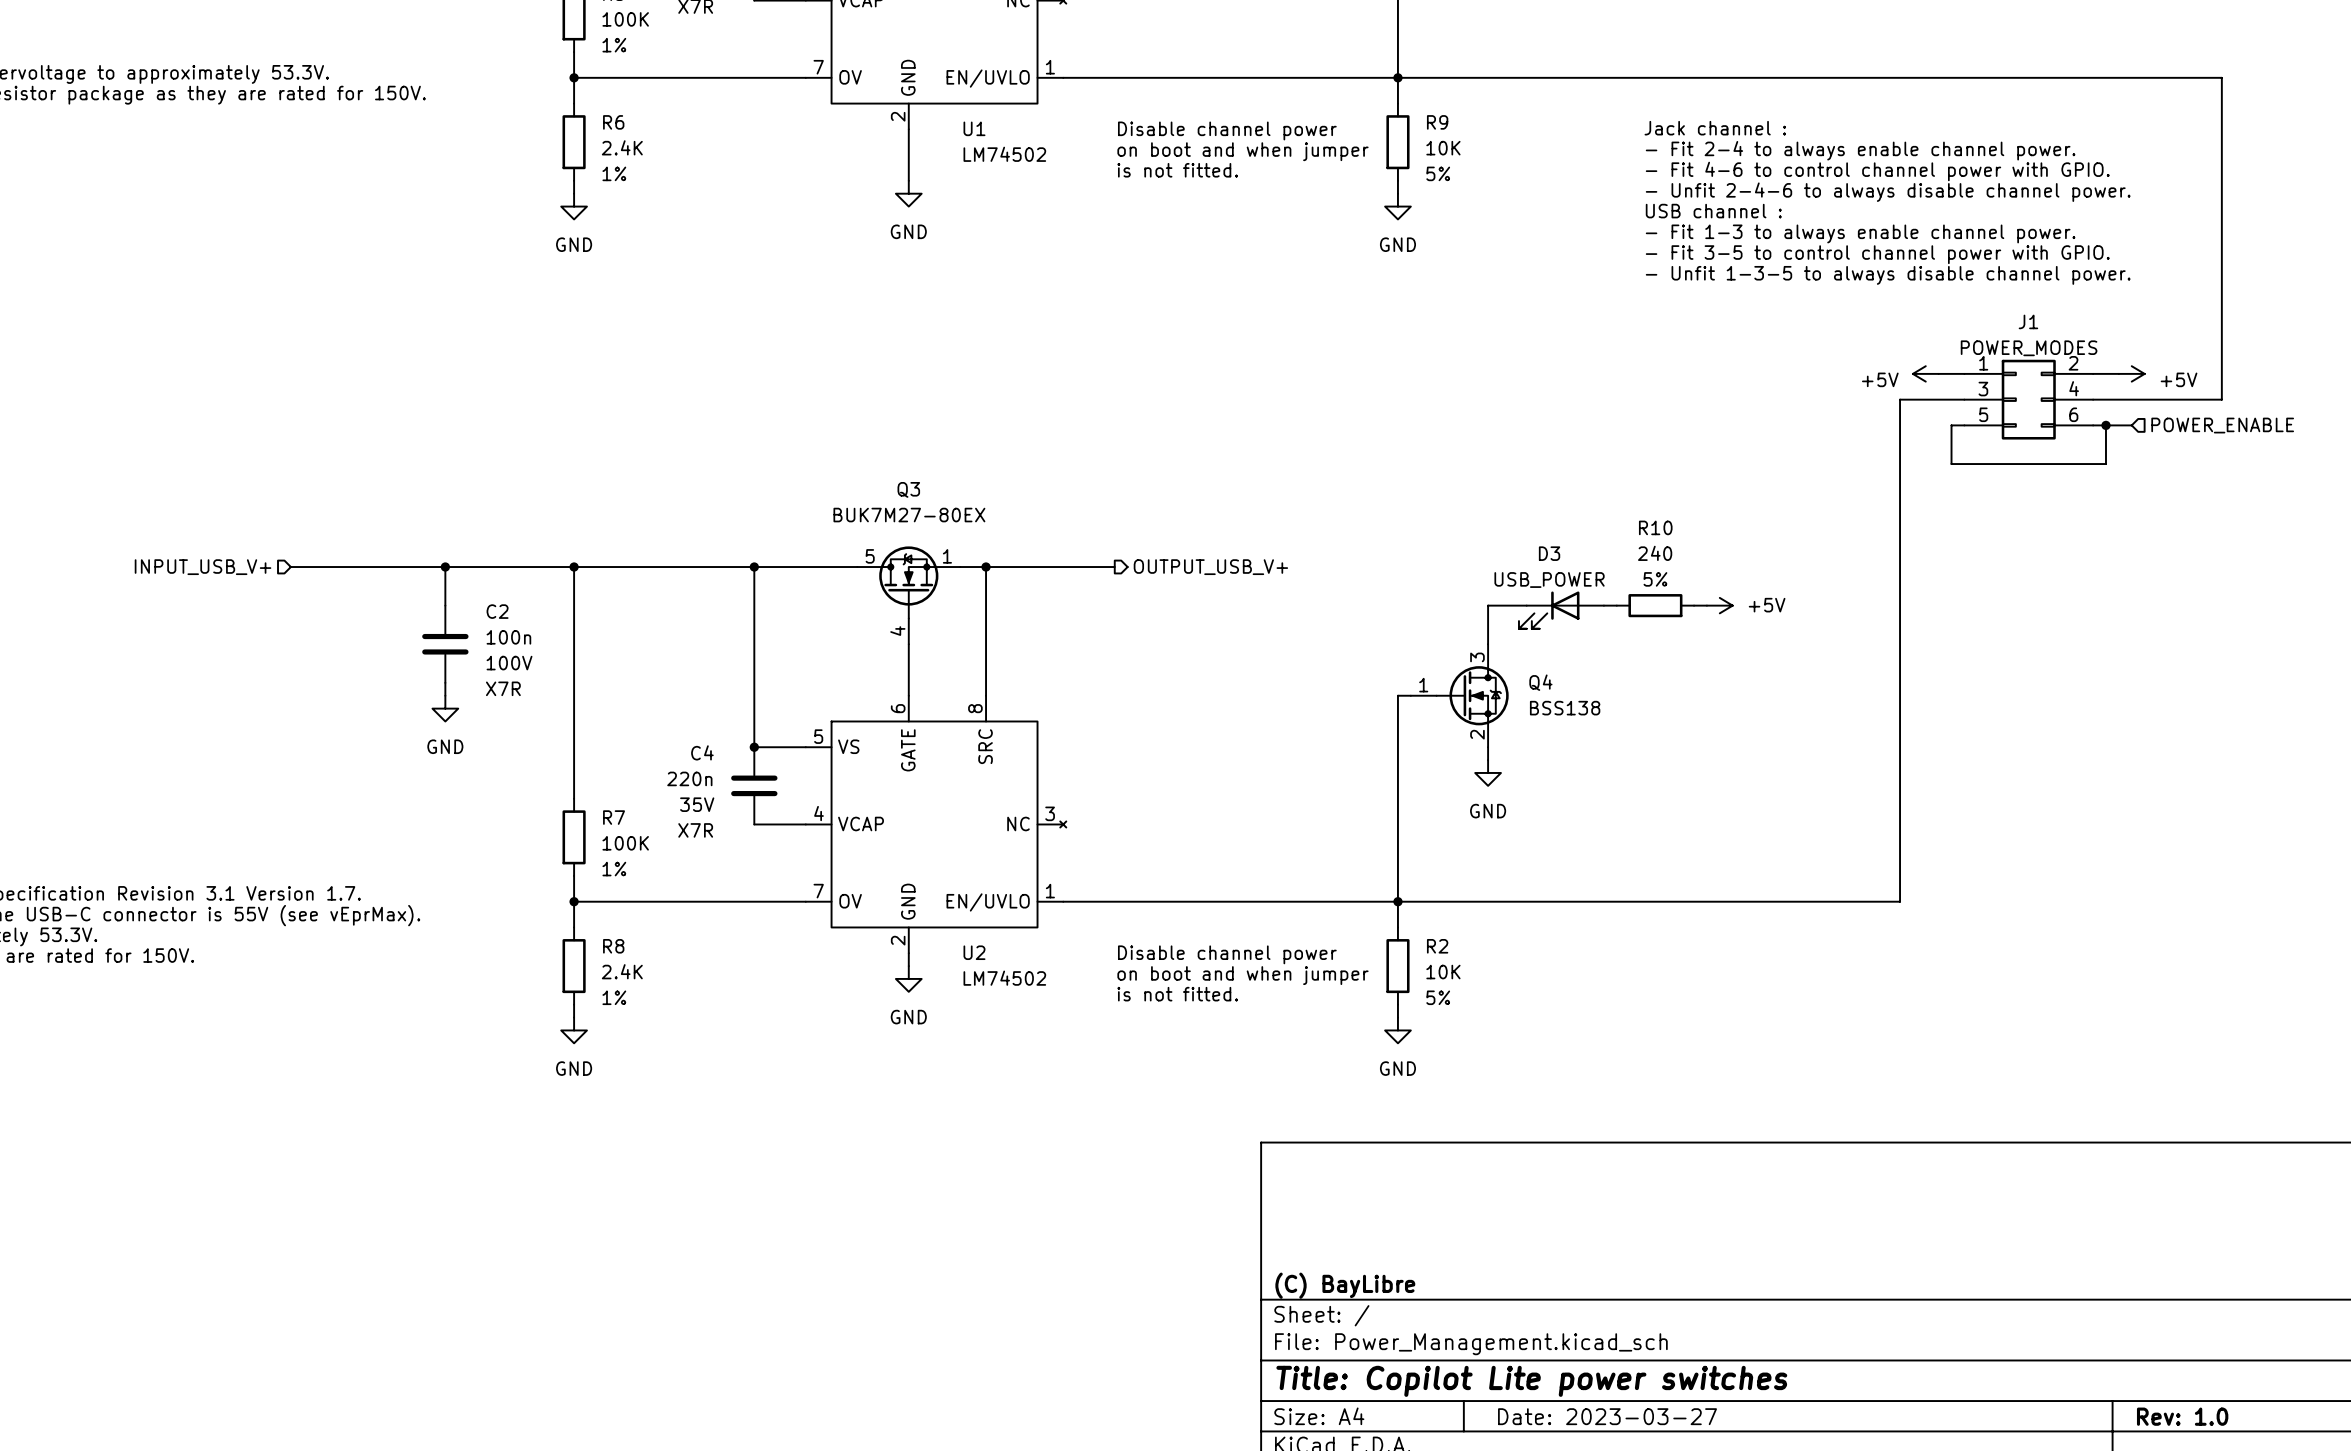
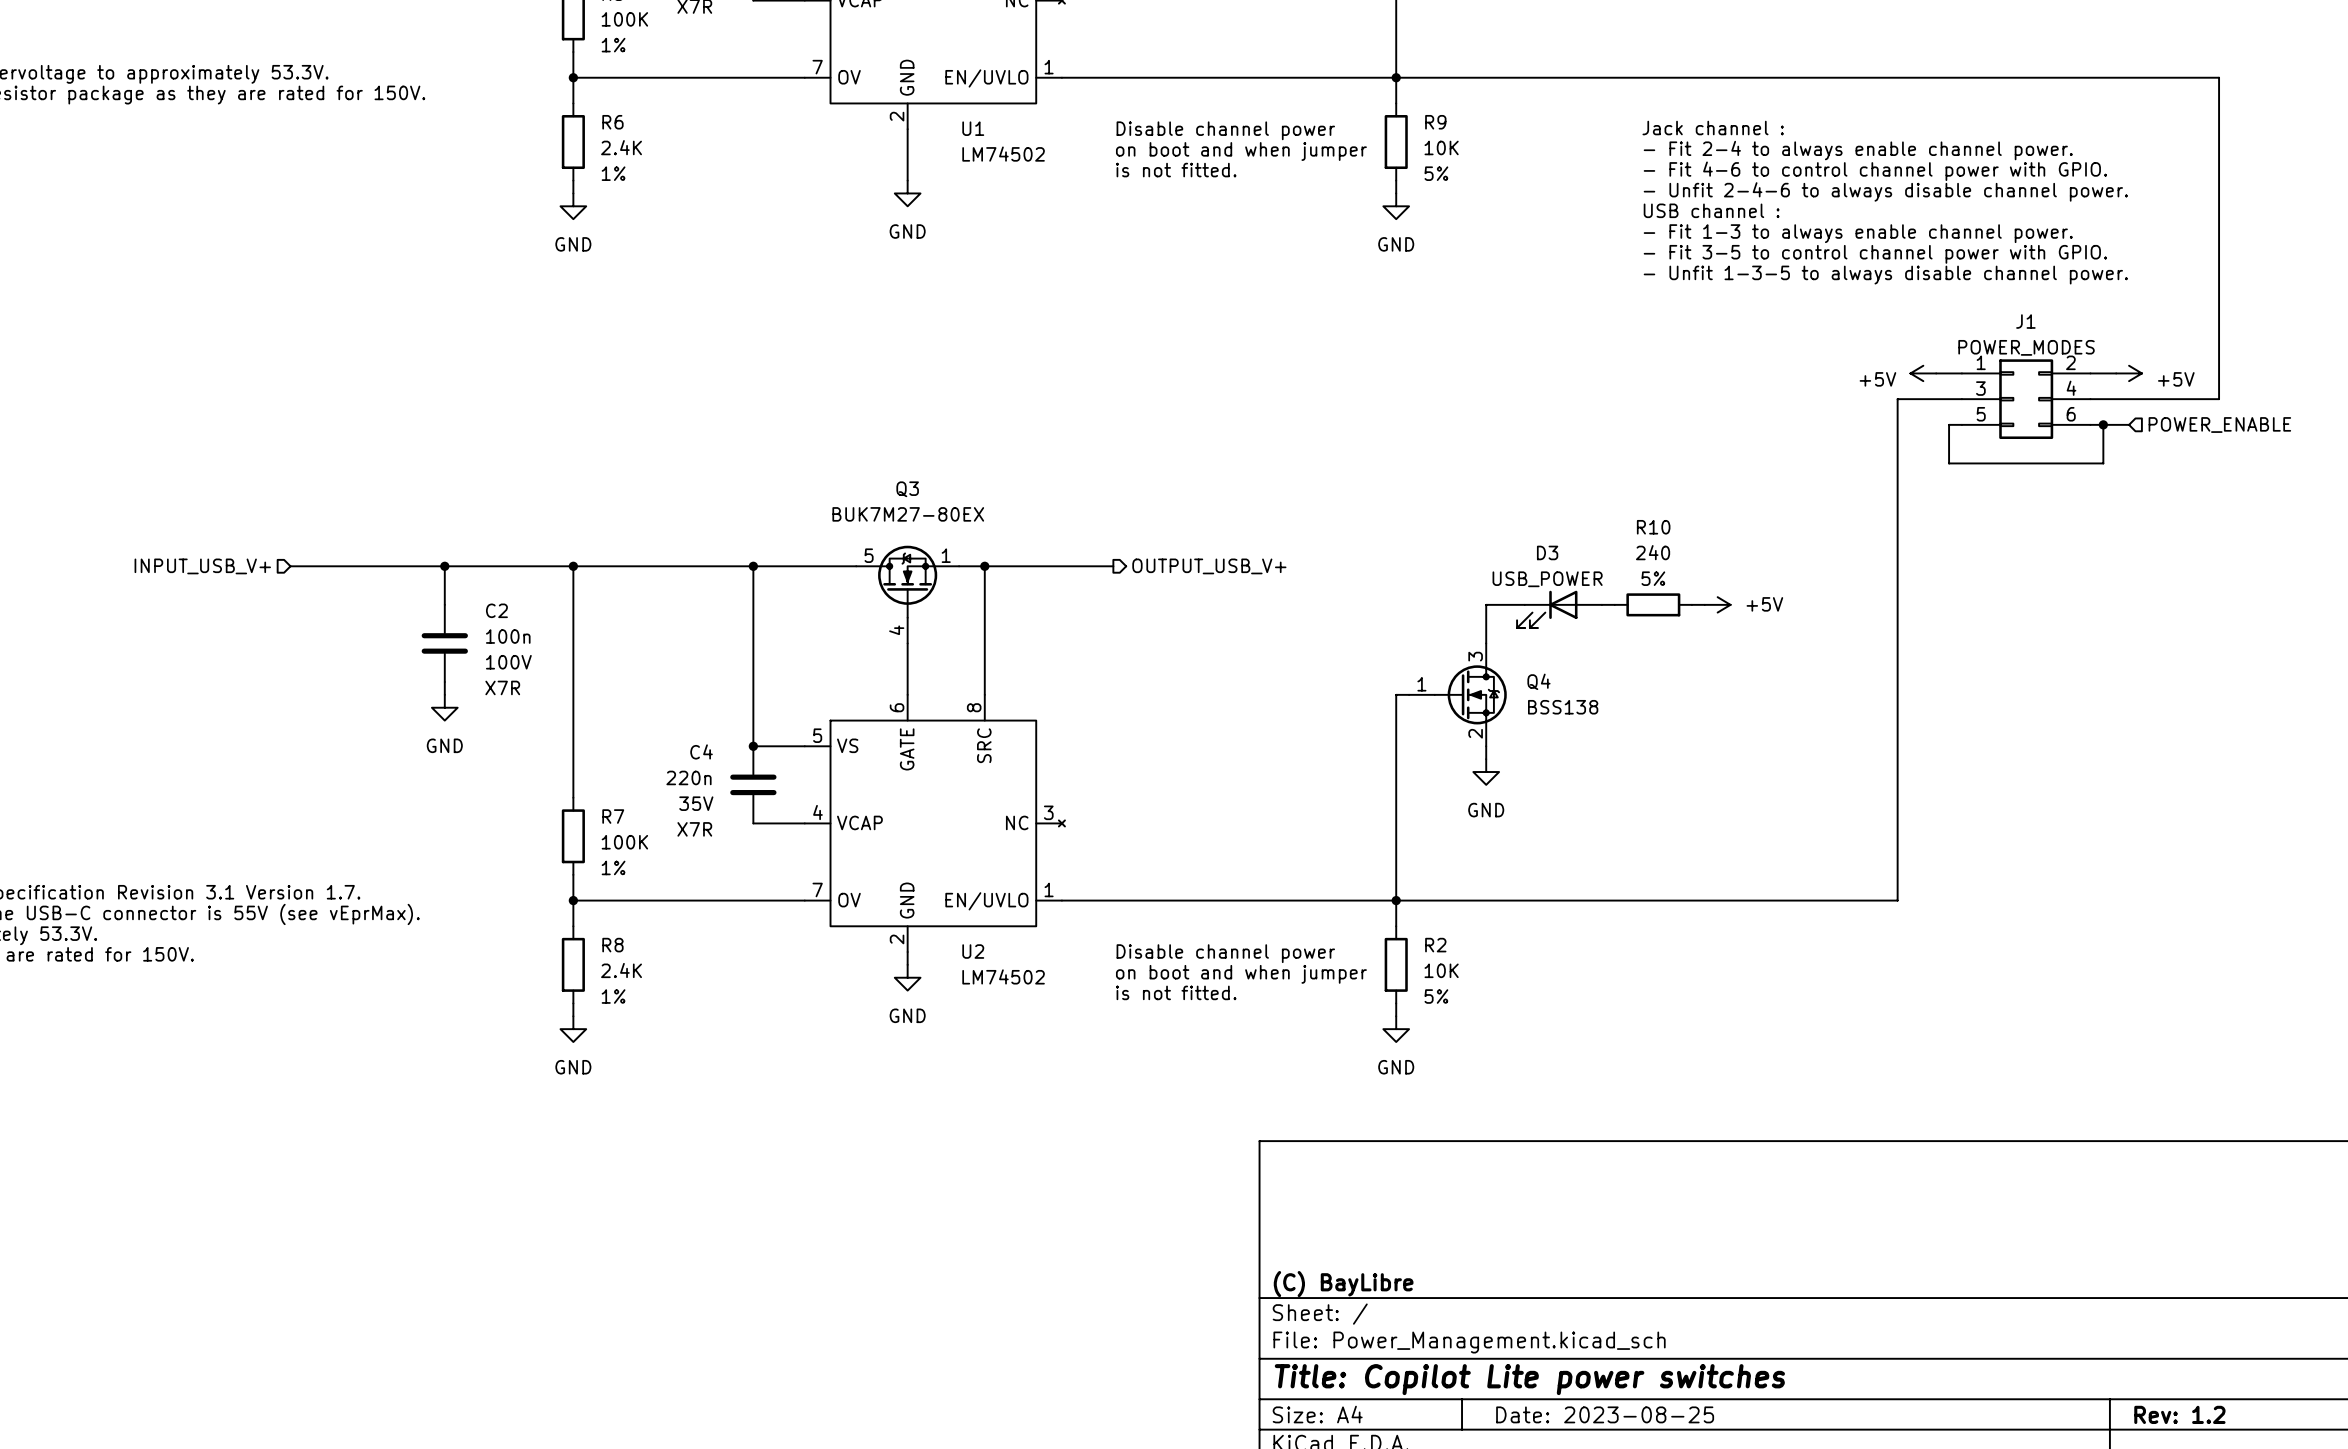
title block: Date: 2023-03-27 (1607, 1416) -> Date: 2023-08-25 (1605, 1414)
title block: Rev: 1.0 (2182, 1416) -> Rev: 1.2 (2179, 1414)

